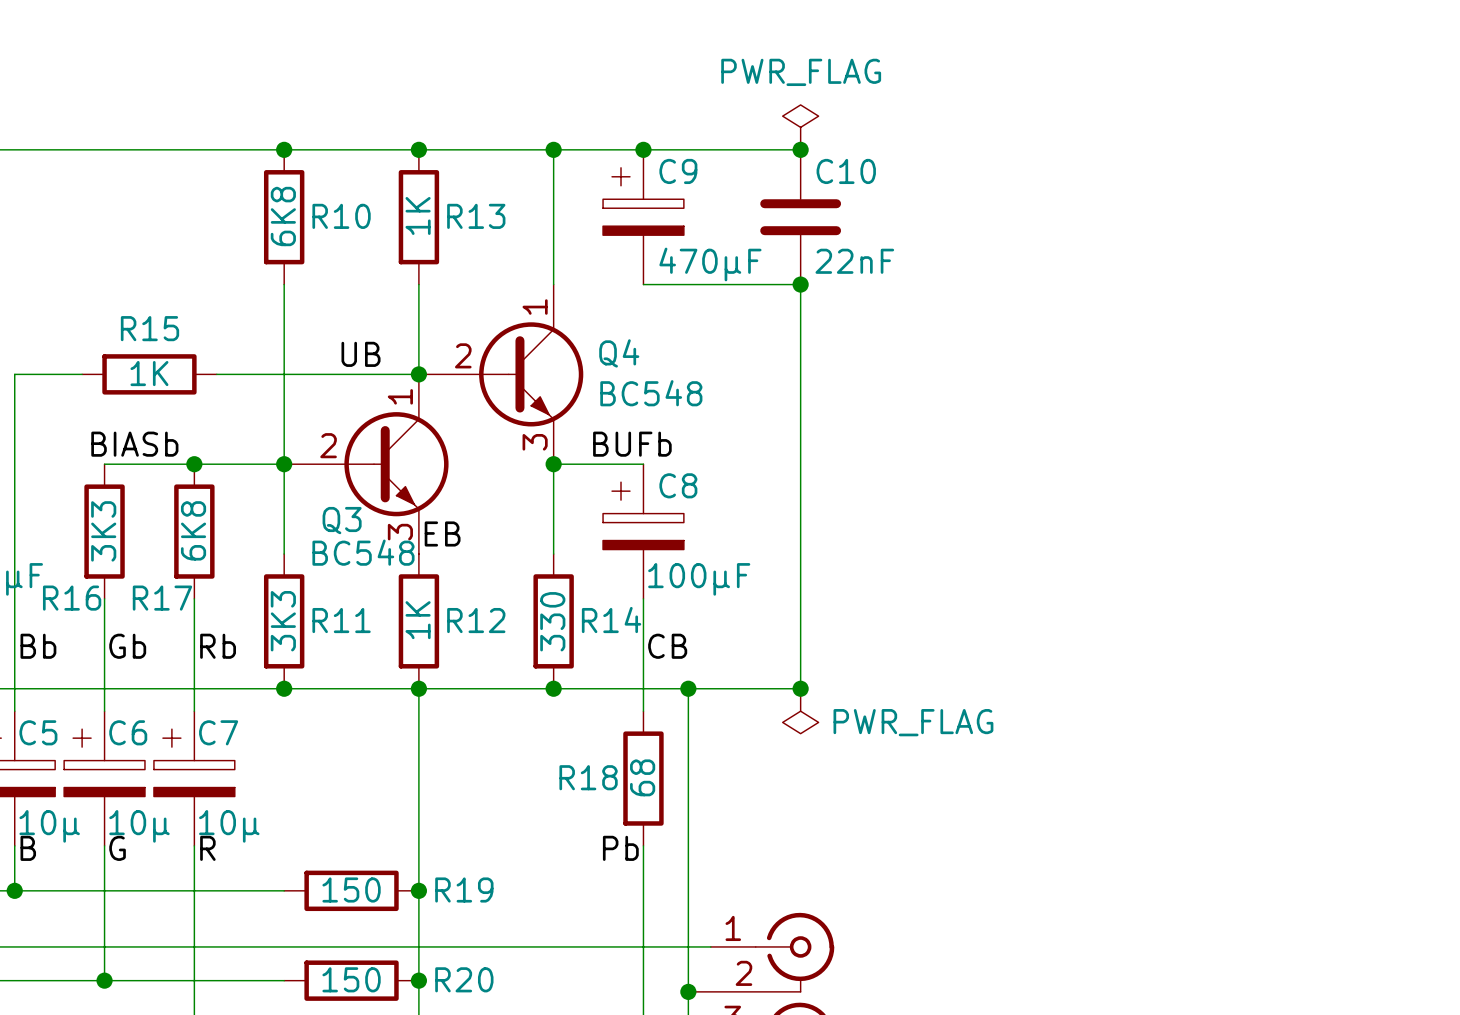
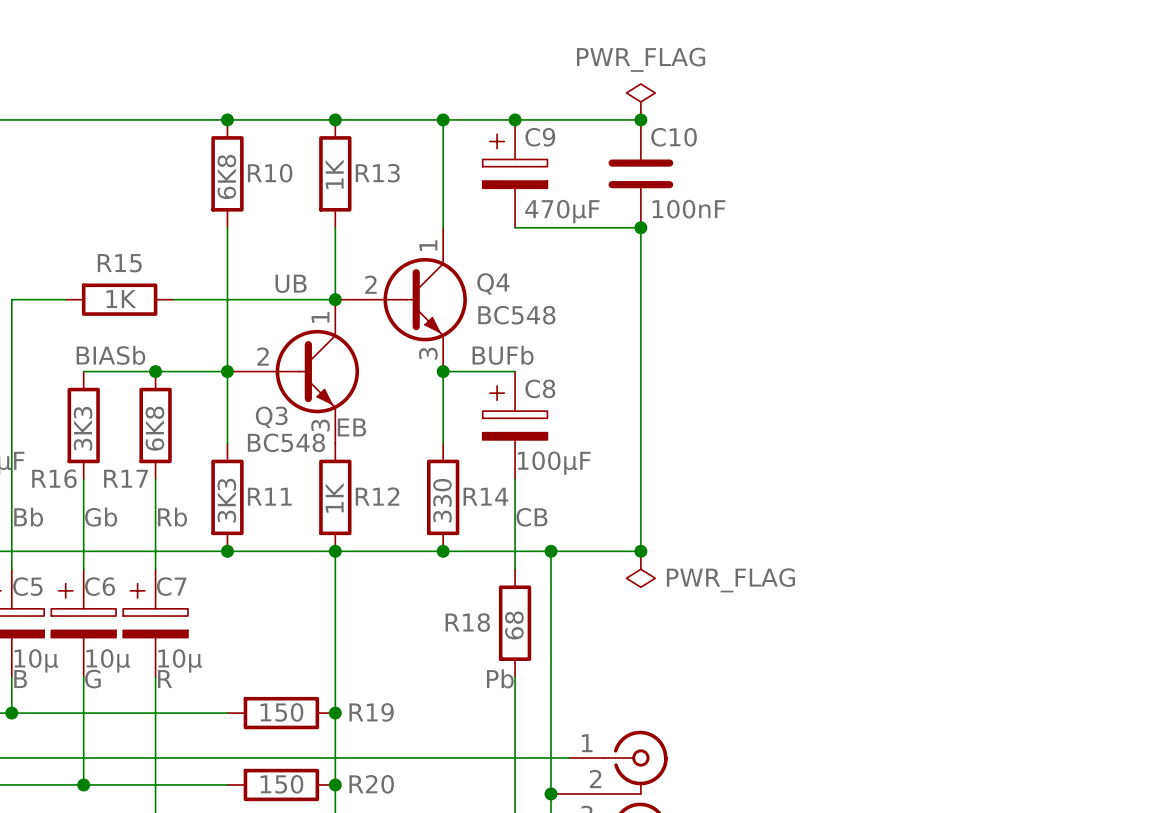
C10 value: 22nF (854, 261) -> 100nF (688, 209)

